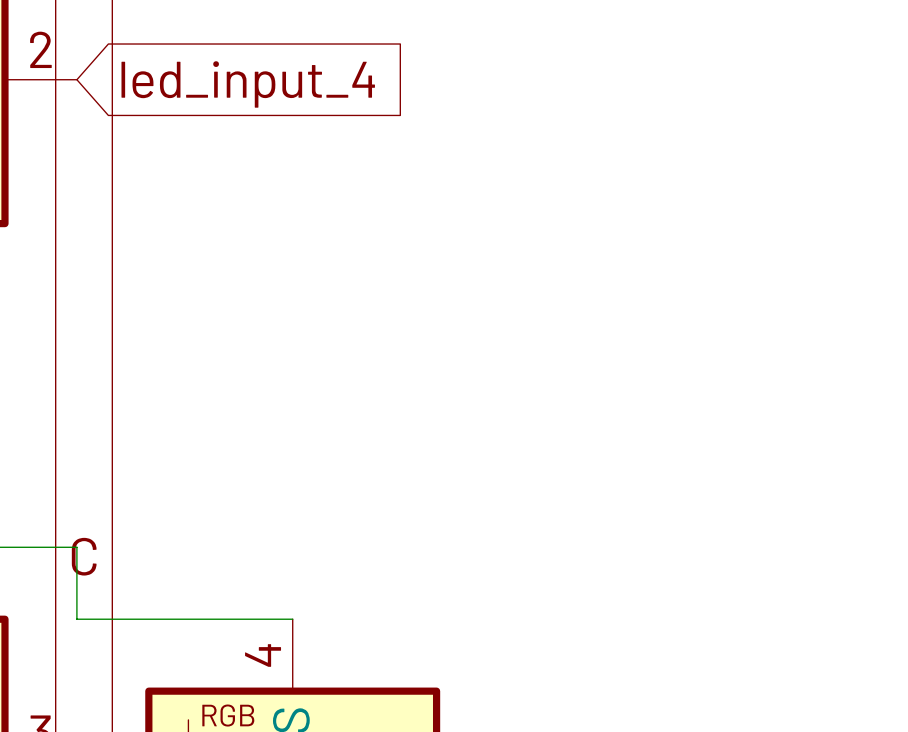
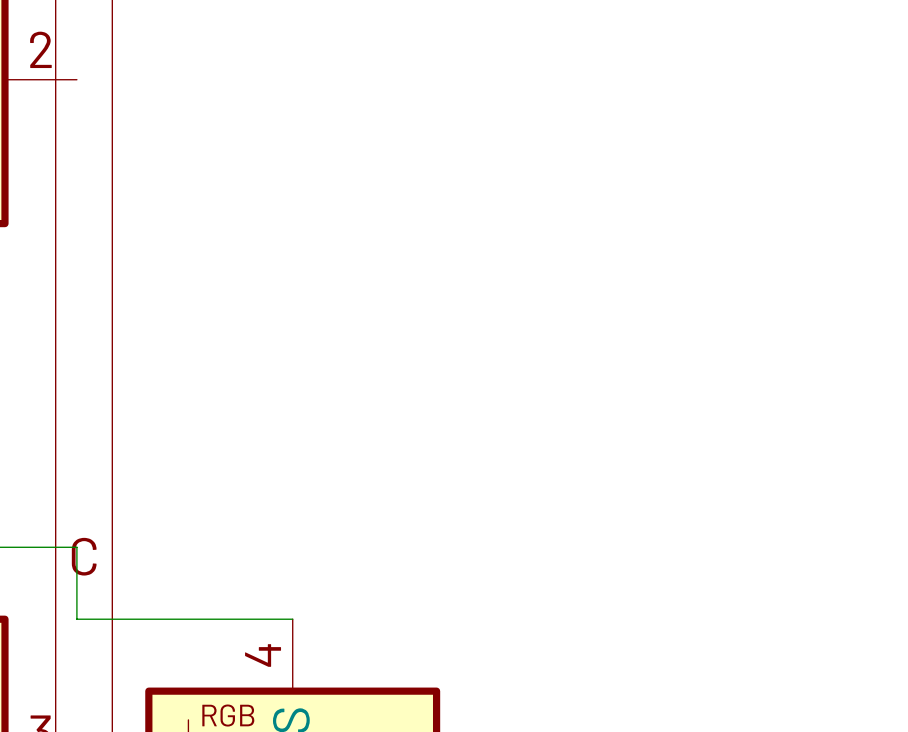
global label: led_input_4 (248, 84) -> none

